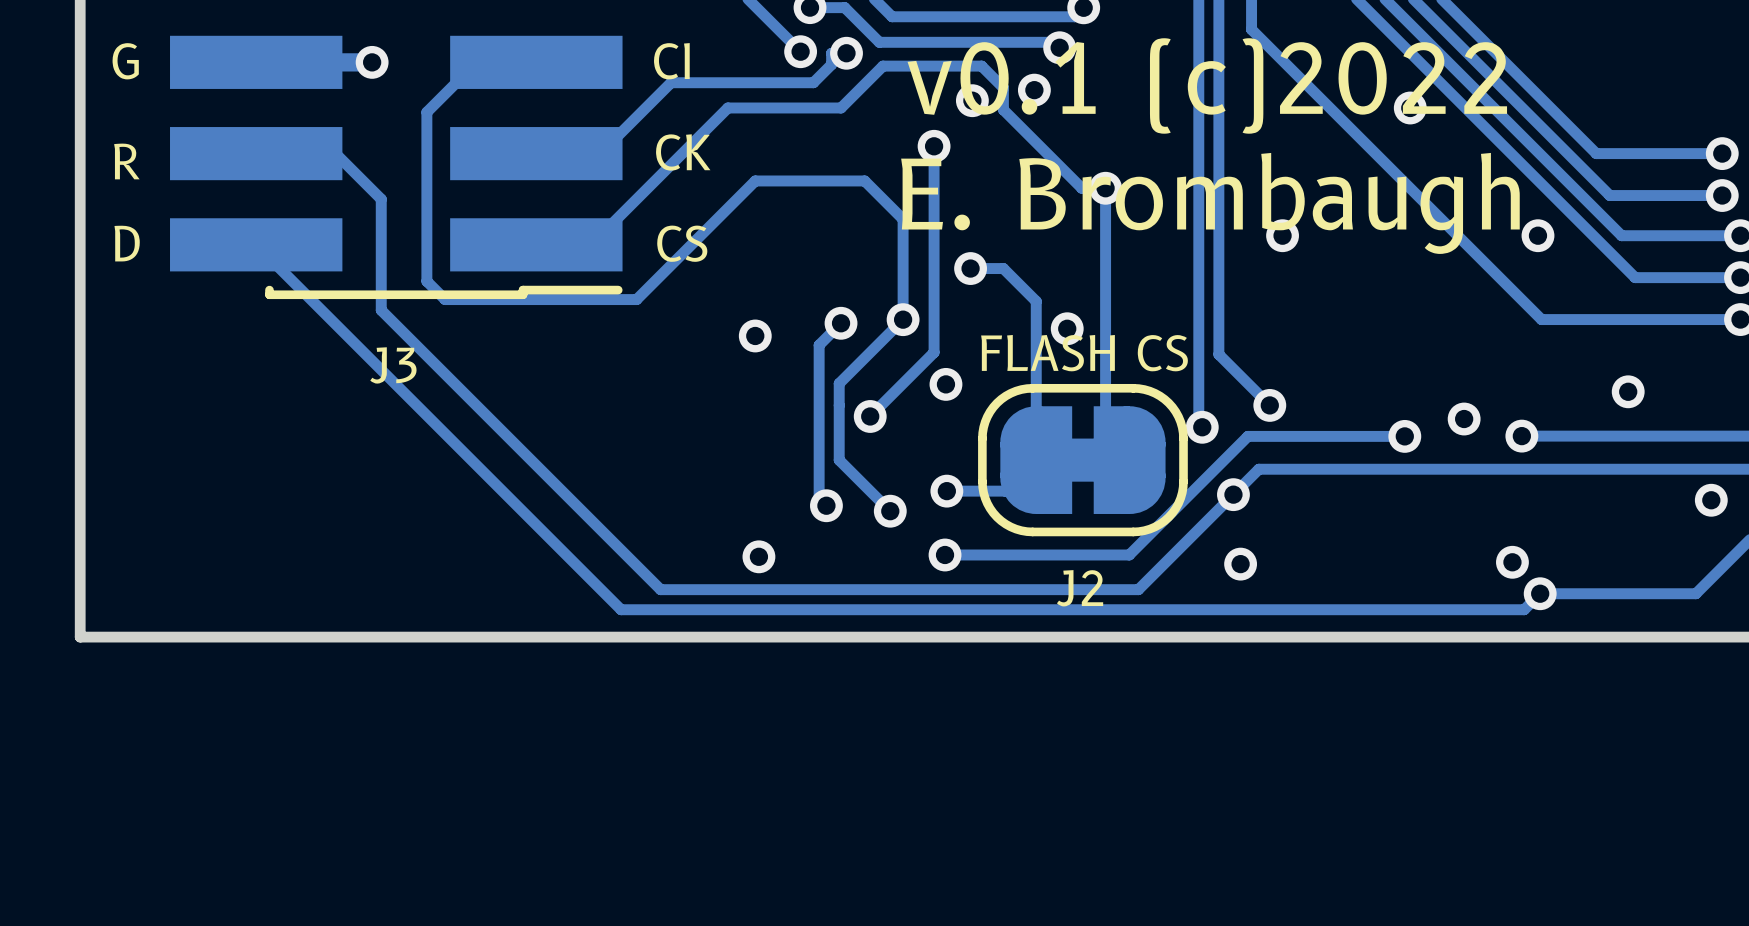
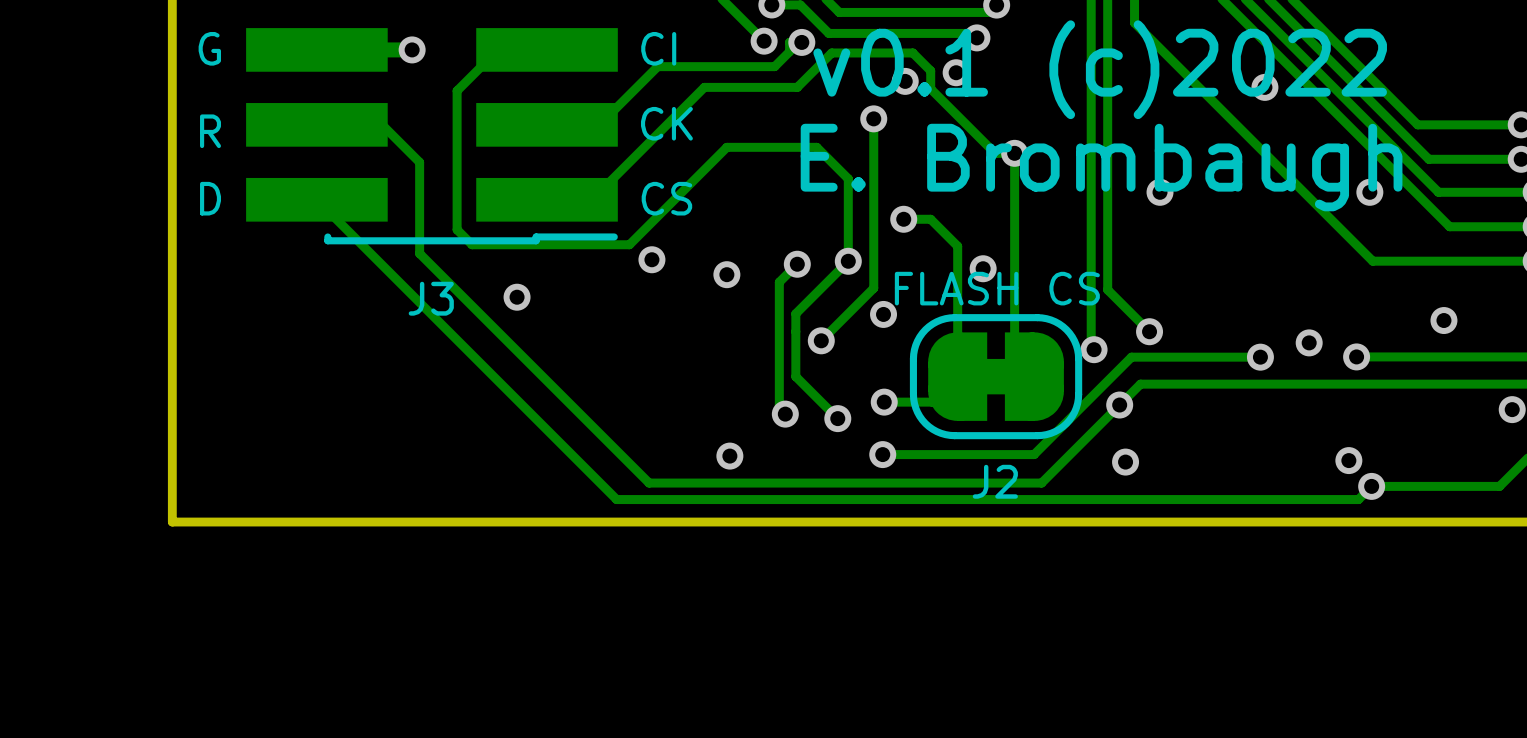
via: none -> (651, 259)
via: none -> (517, 297)

